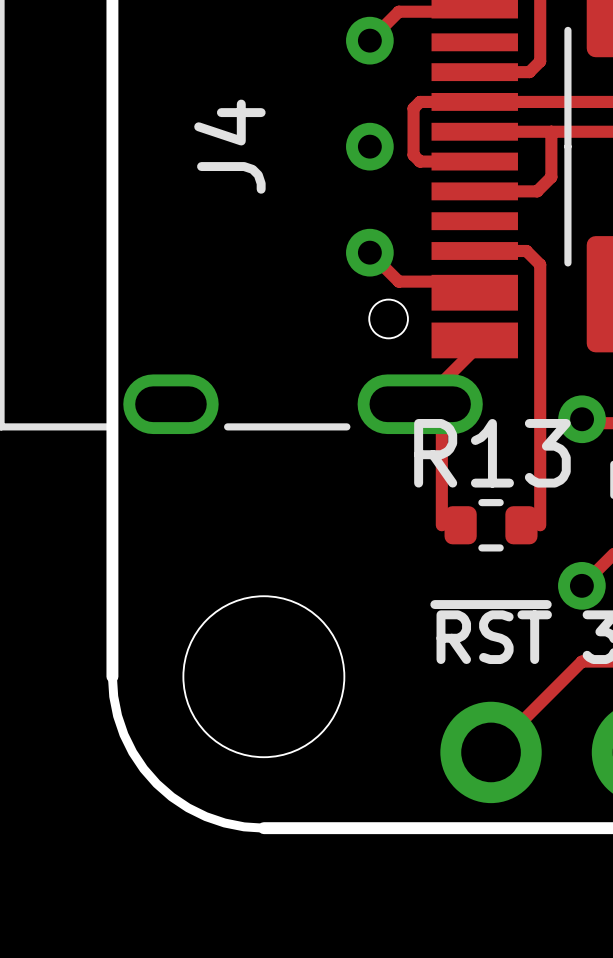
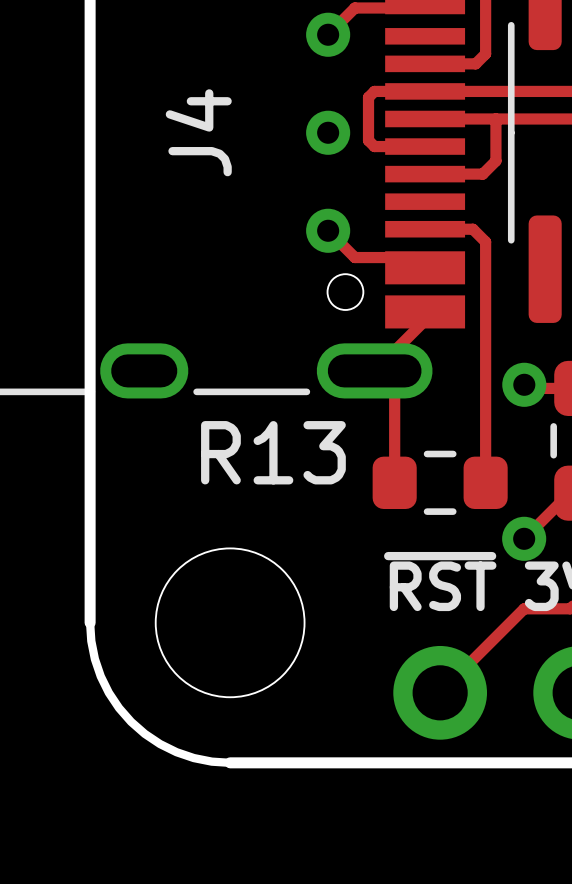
R13 name position: R13 (492, 453) -> R13 (273, 452)
R13 footprint: [444, 499, 538, 552] -> [372, 450, 508, 515]

